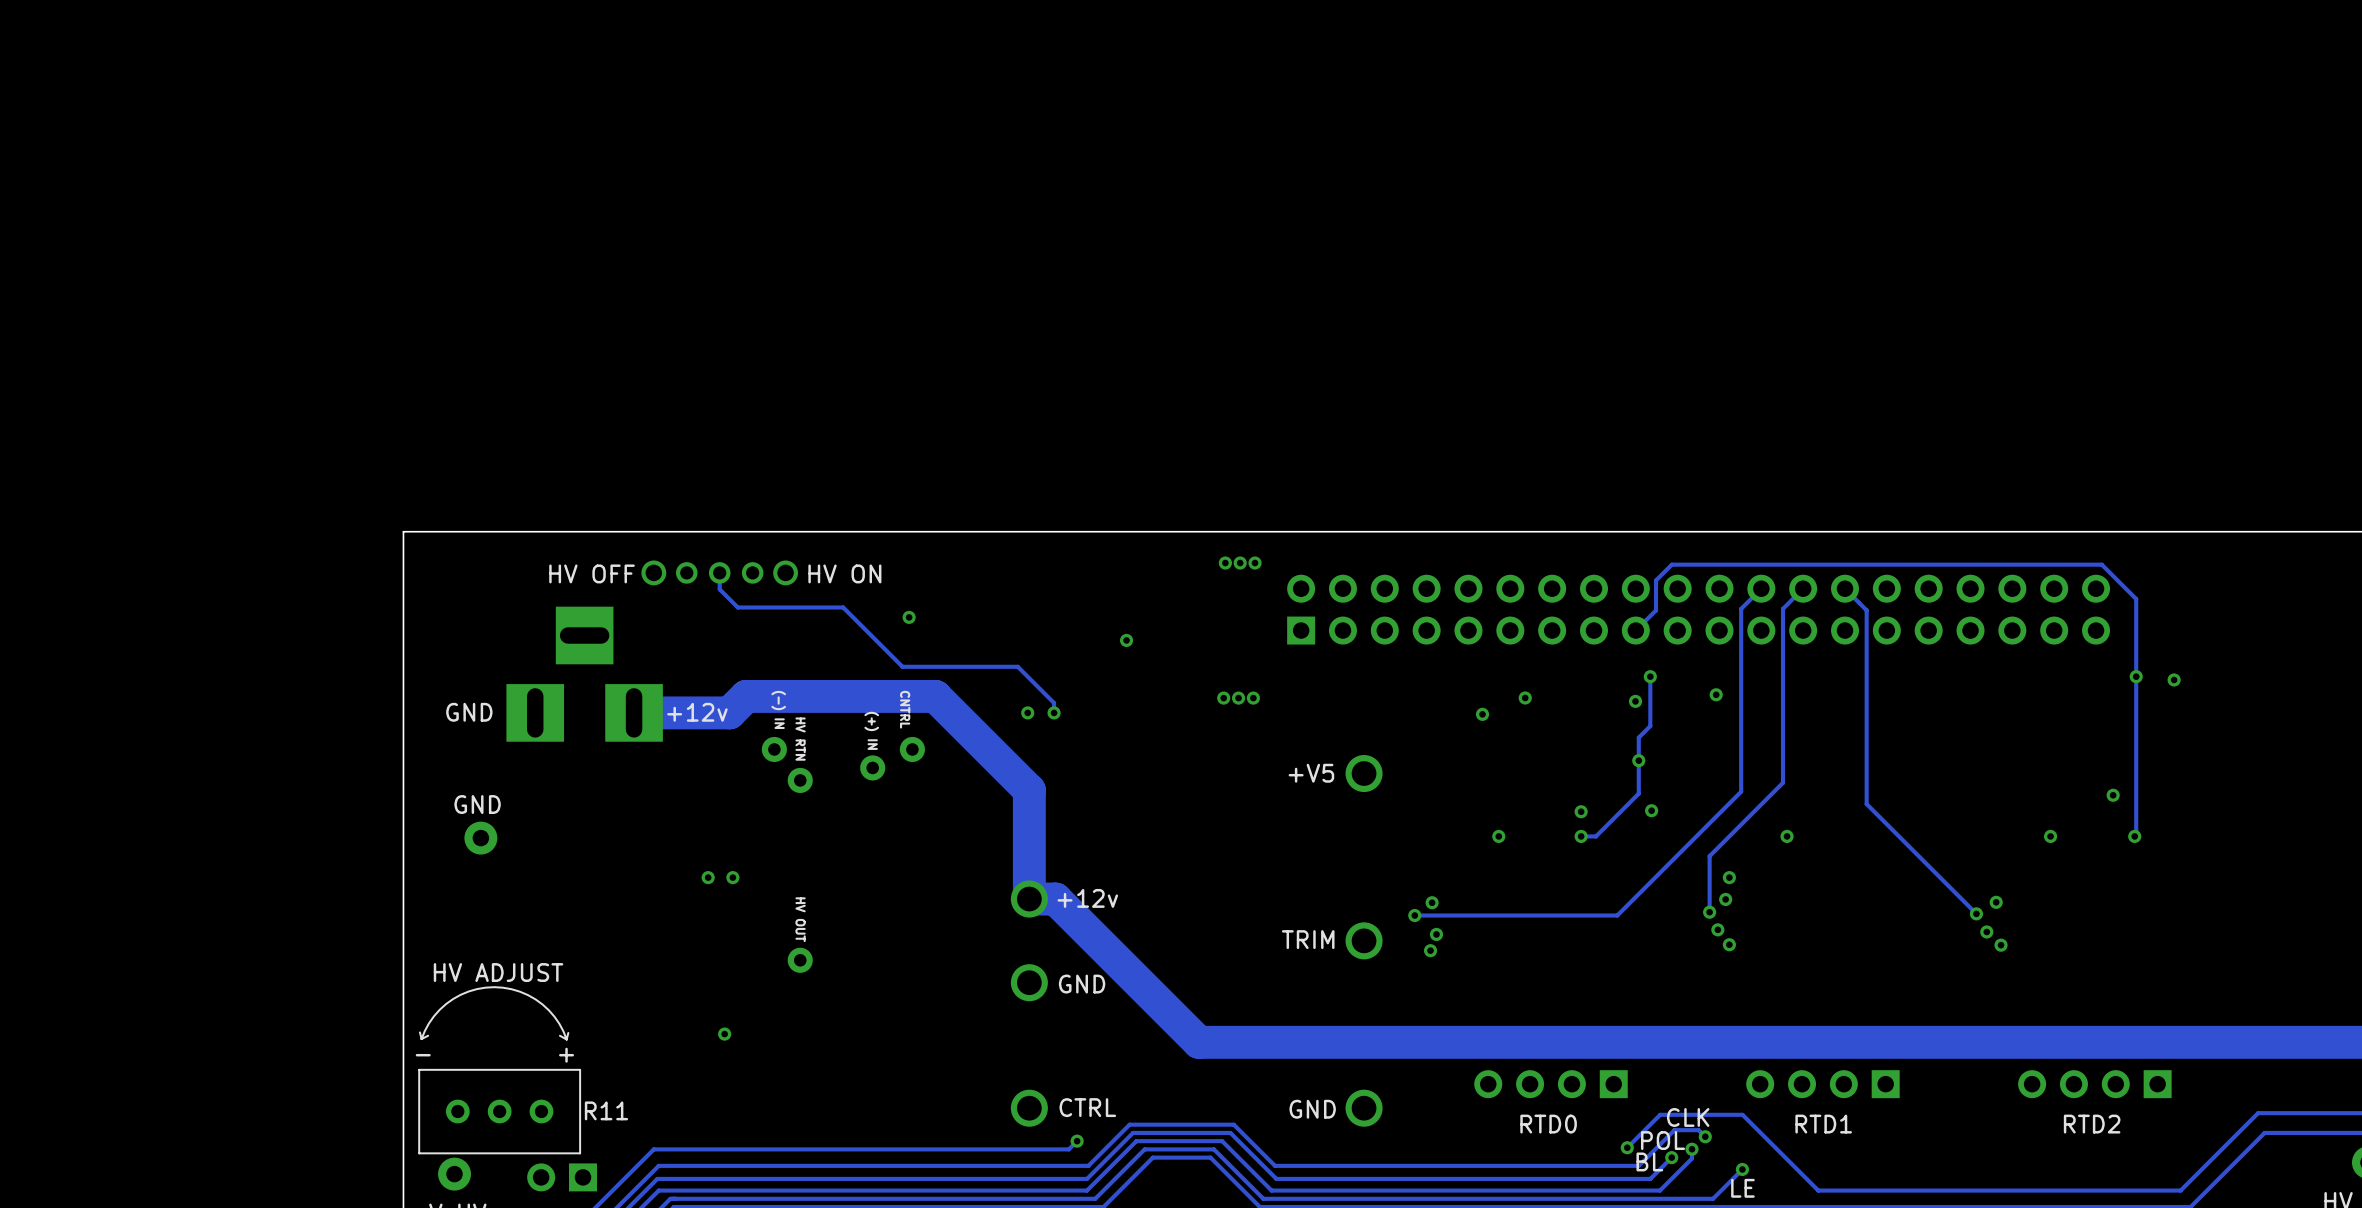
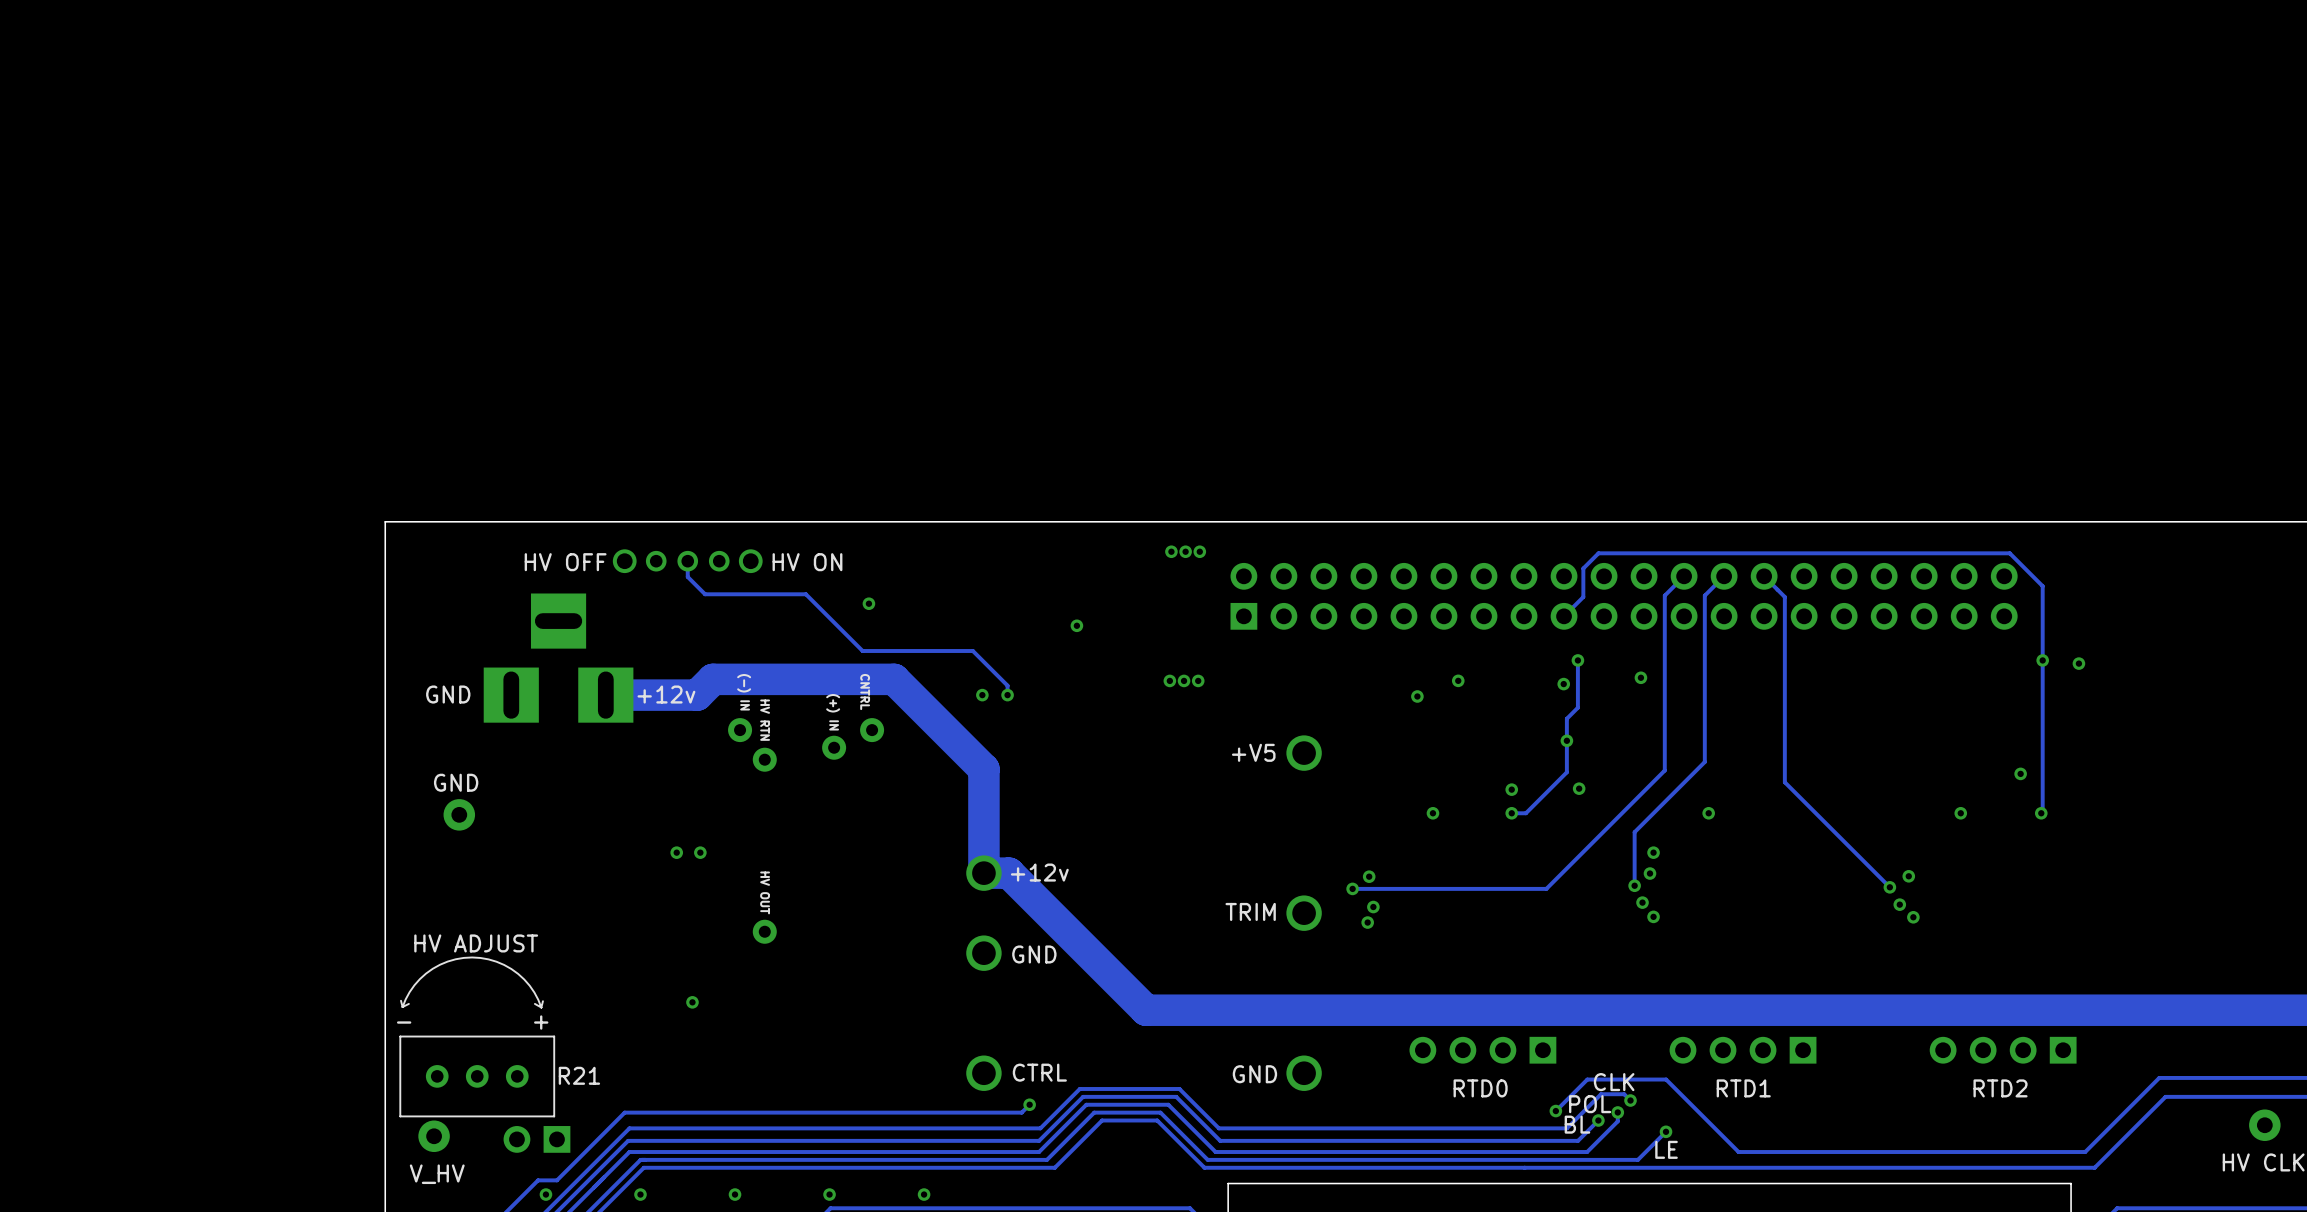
R11 name: R11 (606, 1110) -> R21 (579, 1075)

